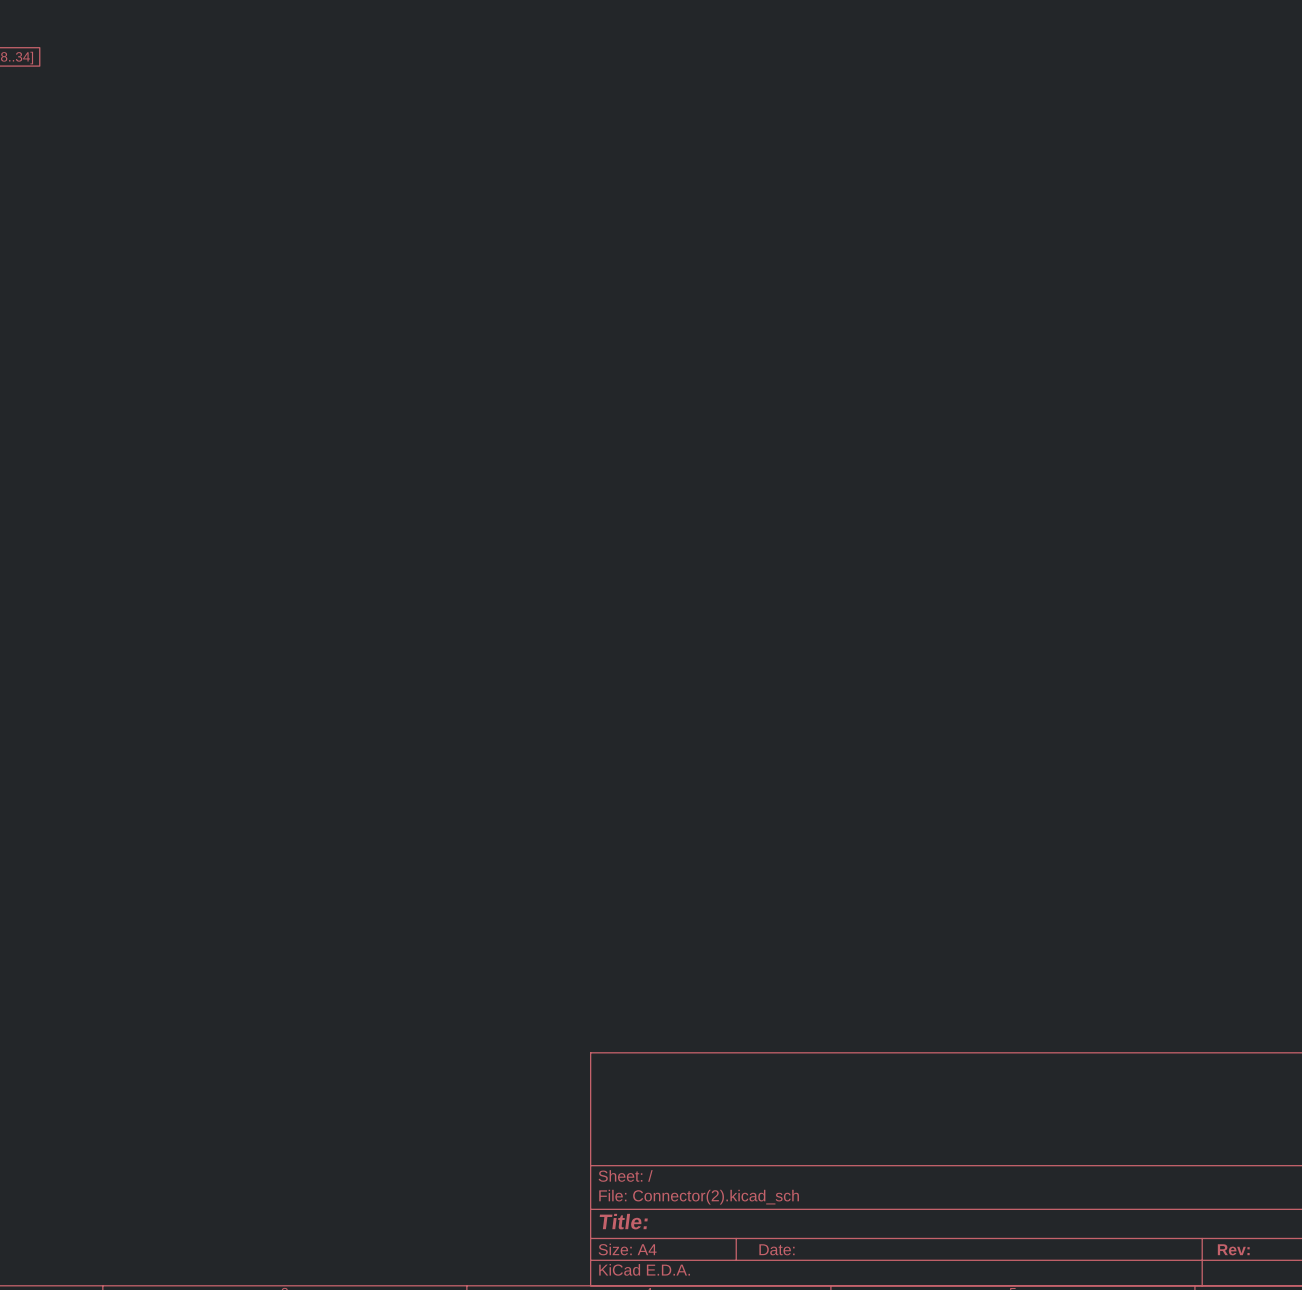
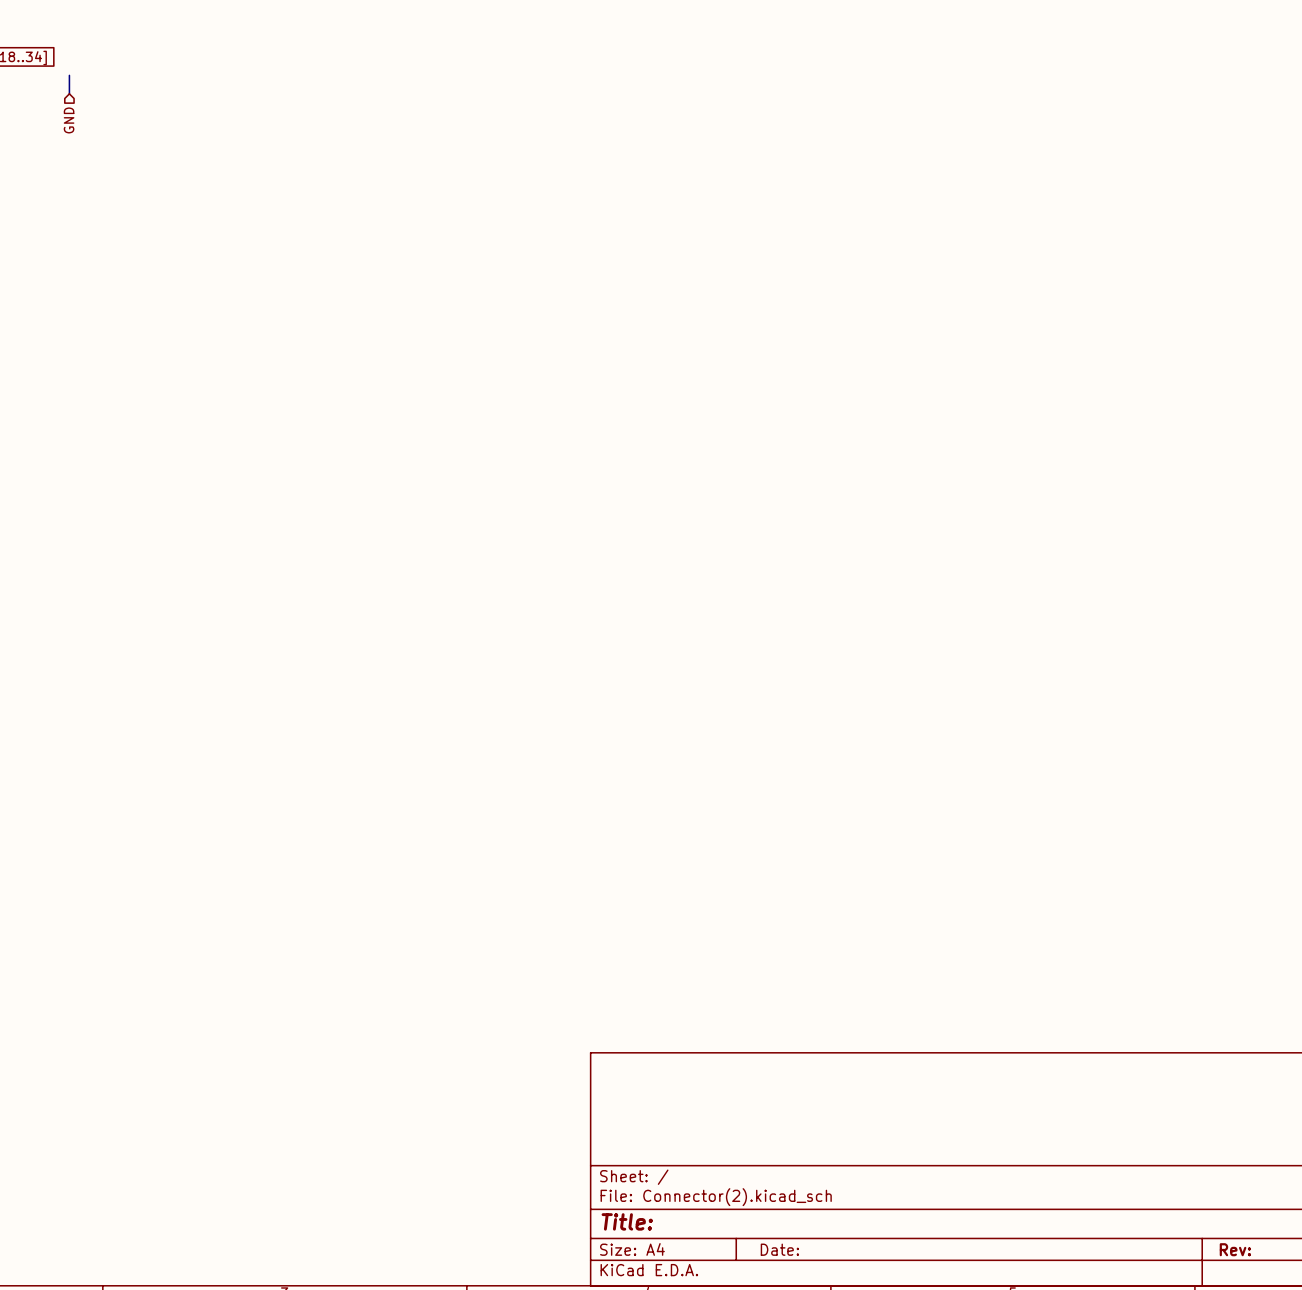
wire: none -> (69, 75) (69, 93)
hierarchical label: none -> GND (69, 120)

